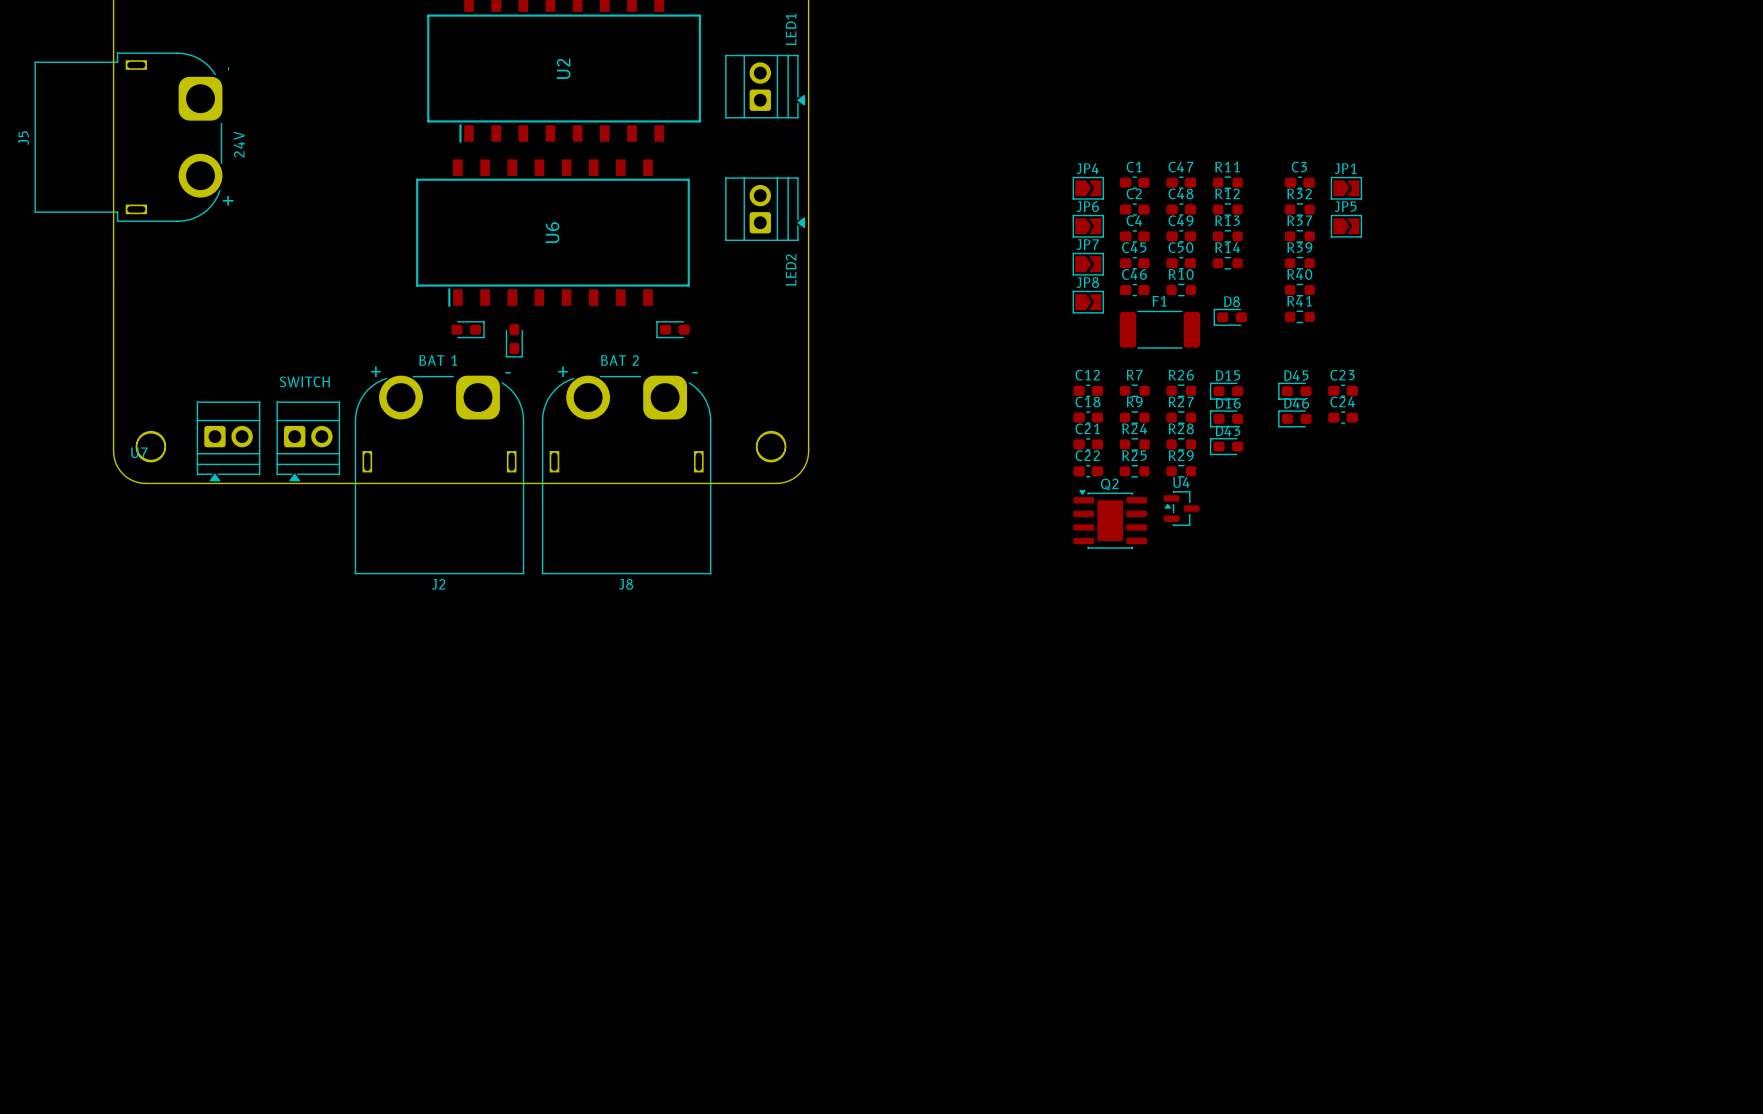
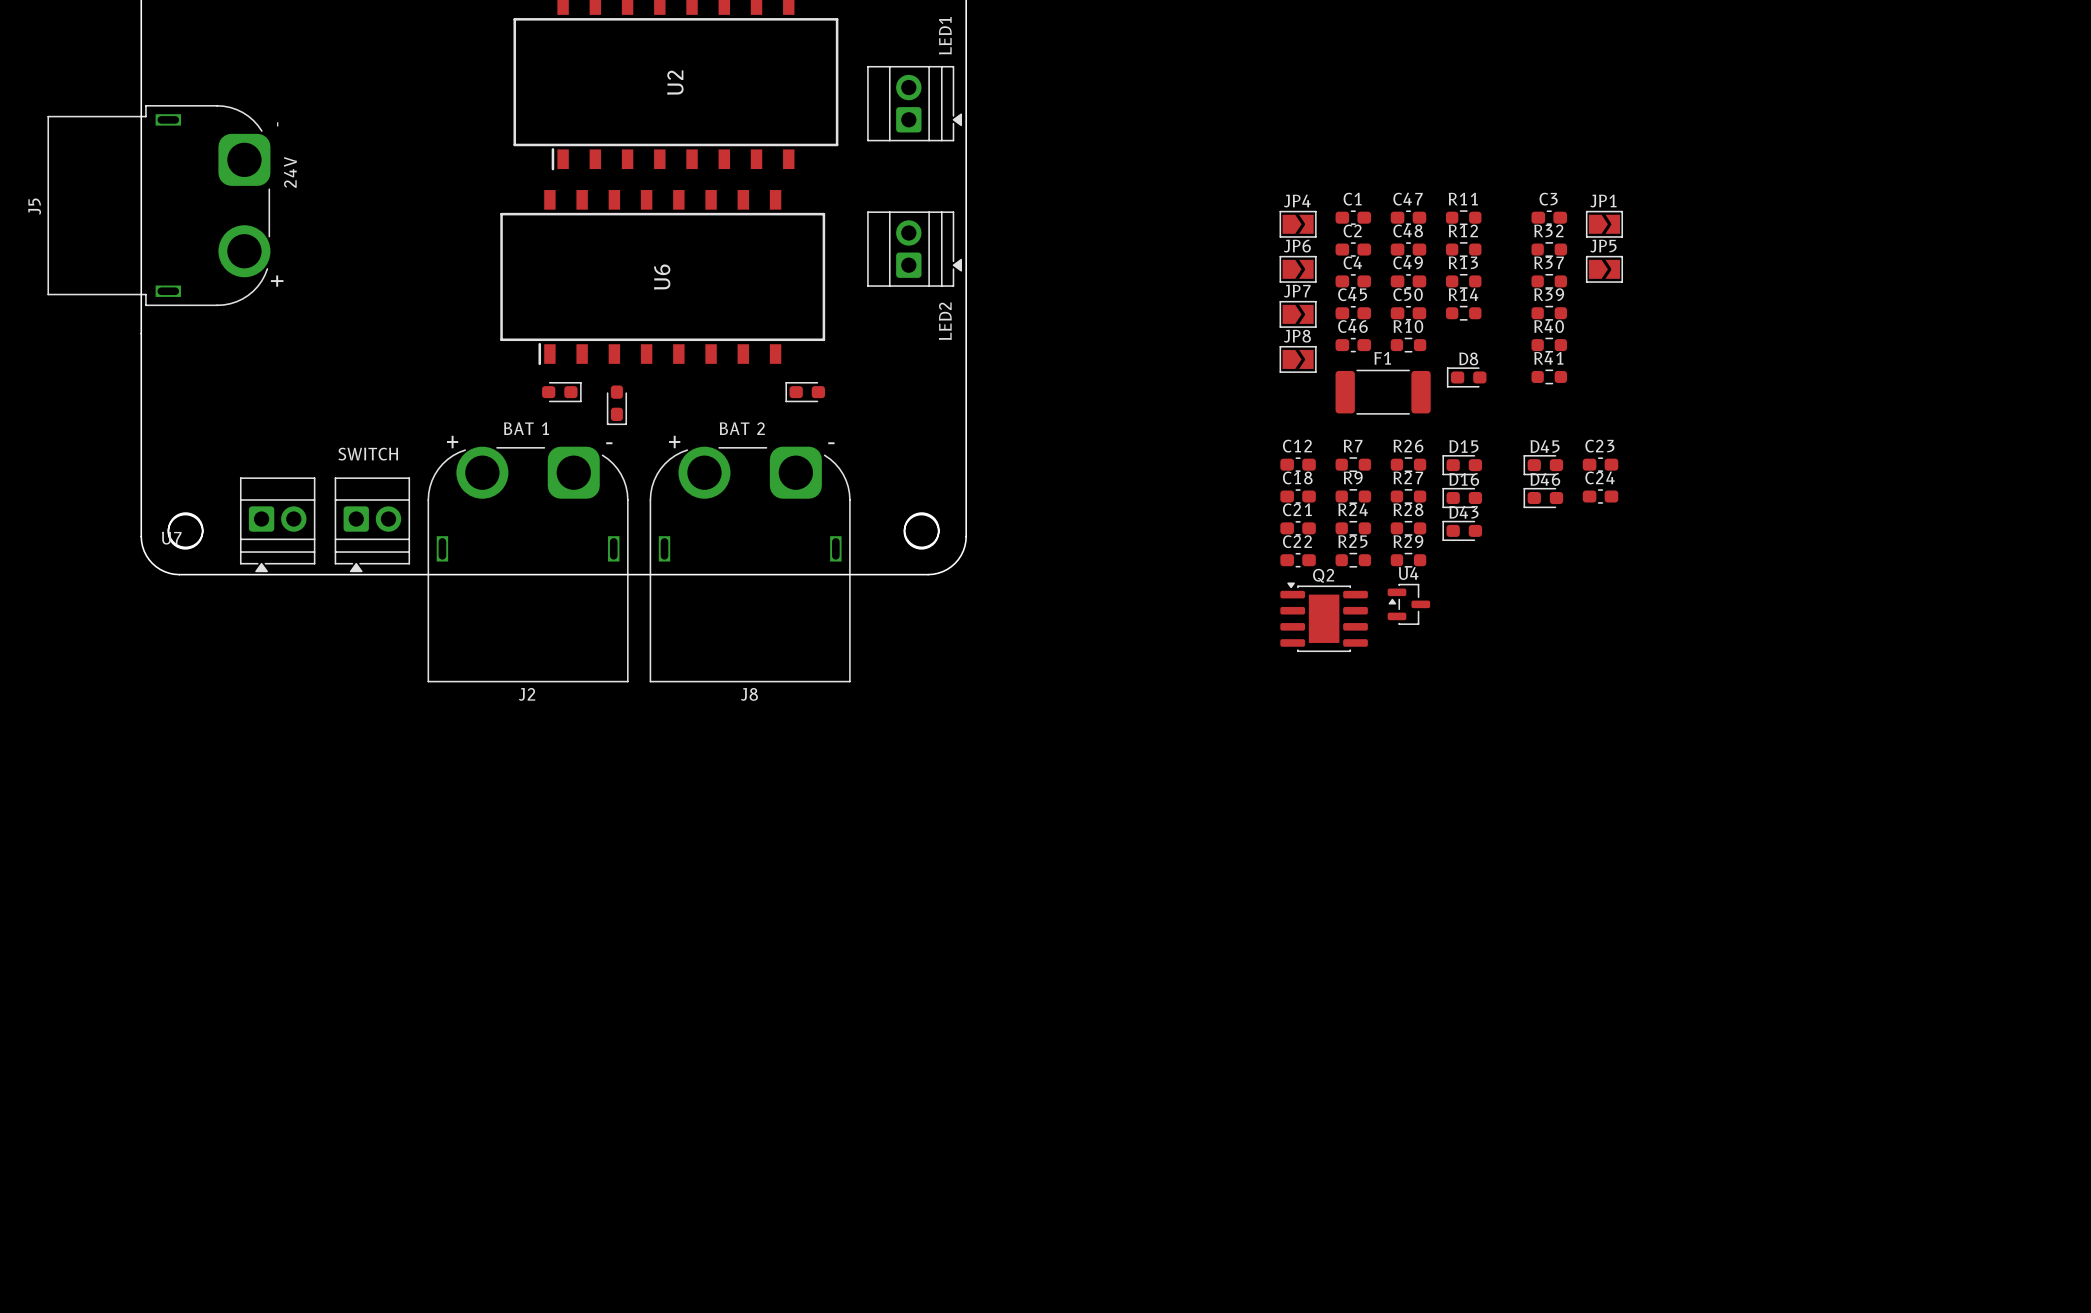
J5 position: (128, 137) -> (158, 205)

